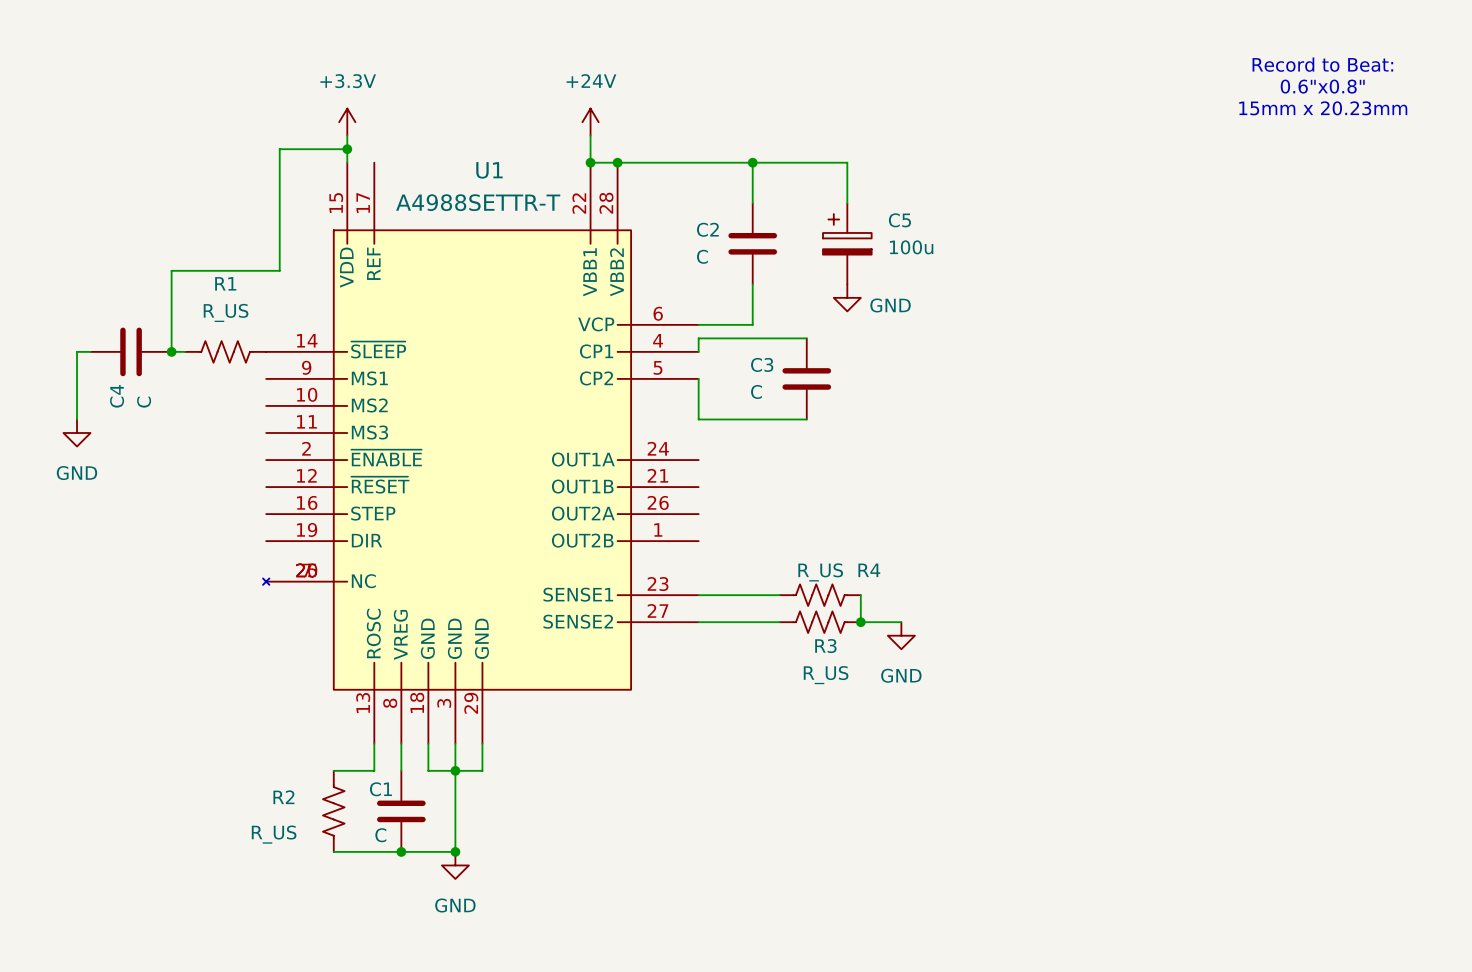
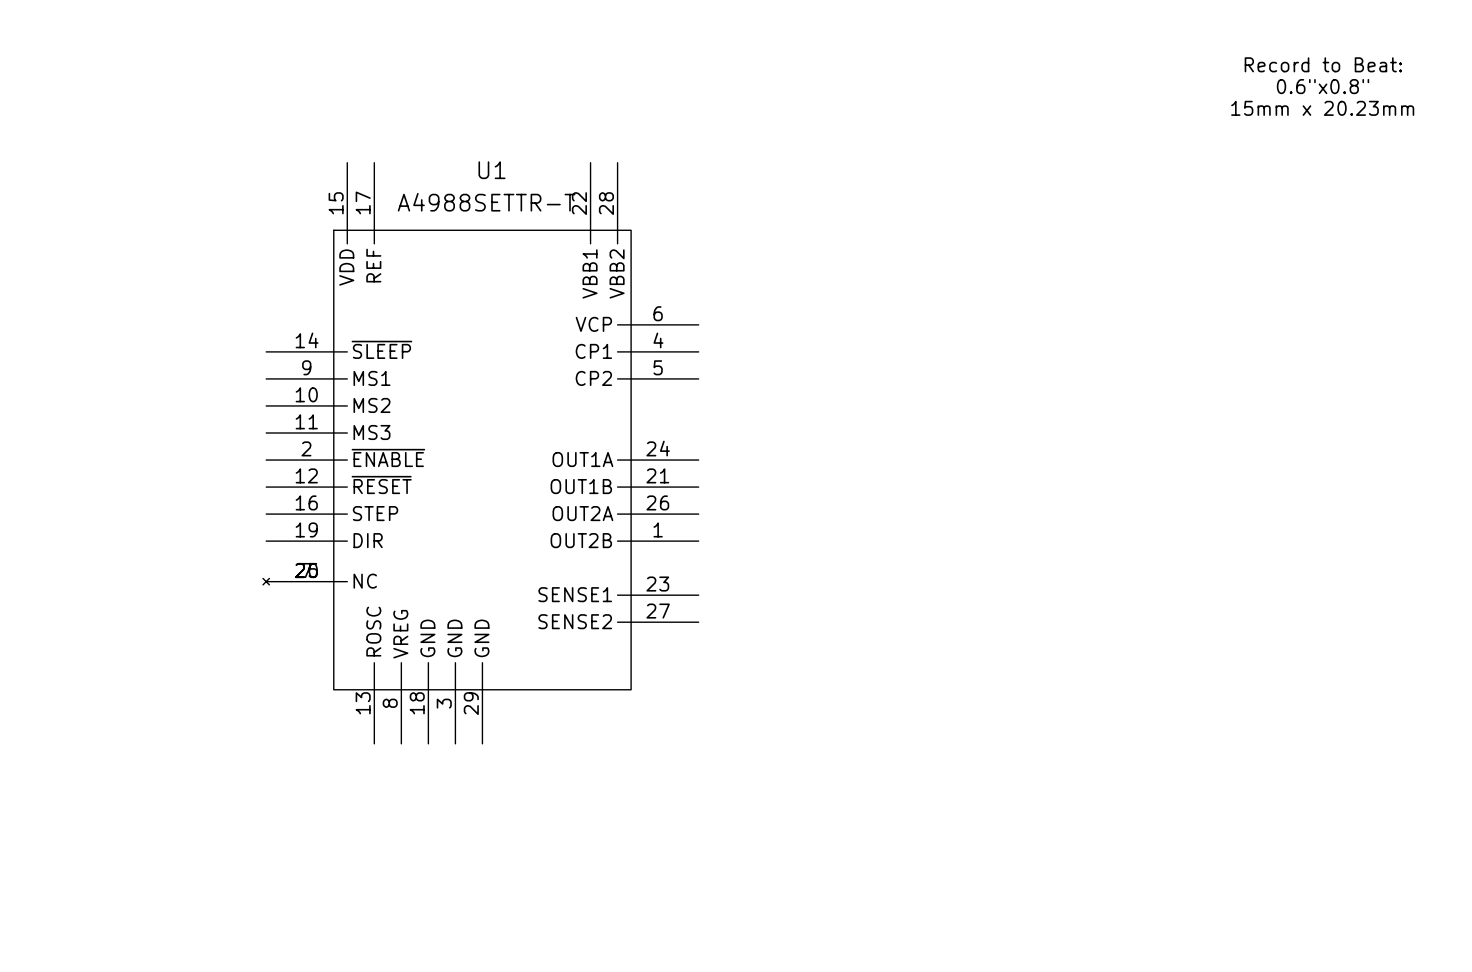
power symbol: +3.3V (347, 122) -> none
power symbol: +24V (590, 122) -> none
wire: (347, 135) (347, 162) -> none
wire: (590, 135) (590, 162) (847, 162) (847, 203) -> none
wire: (347, 149) (279, 149) (279, 270) (171, 270) (171, 351) (185, 351) -> none
junction: (347, 149) -> none
junction: (590, 162) -> none
junction: (617, 162) -> none
wire: (752, 162) (752, 203) -> none
junction: (752, 162) -> none
C2: C (752, 243) -> none
C5: 100u (847, 243) -> none
wire: (752, 284) (752, 324) (698, 324) -> none
power symbol: GND (847, 297) -> none
wire: (806, 338) (698, 338) (698, 351) -> none
wire: (90, 351) (77, 351) (77, 419) -> none
C4: C (131, 351) -> none
junction: (171, 351) -> none
R1: R_US (225, 351) -> none
wire: (698, 378) (698, 419) (806, 419) -> none
C3: C (806, 378) -> none
power symbol: GND (77, 433) -> none
wire: (698, 595) (779, 595) -> none
R4: R_US (820, 595) -> none
wire: (860, 595) (860, 622) (901, 622) -> none
wire: (698, 622) (779, 622) -> none
R3: R_US (820, 622) -> none
junction: (860, 622) -> none
power symbol: GND (901, 635) -> none
wire: (374, 743) (374, 770) (333, 770) -> none
wire: (401, 743) (401, 770) -> none
wire: (428, 743) (428, 770) (482, 770) (482, 743) -> none
wire: (455, 743) (455, 851) (333, 851) -> none
junction: (455, 770) -> none
R2: R_US (333, 811) -> none
C1: C (401, 811) -> none
junction: (401, 851) -> none
junction: (455, 851) -> none
power symbol: GND (455, 865) -> none

